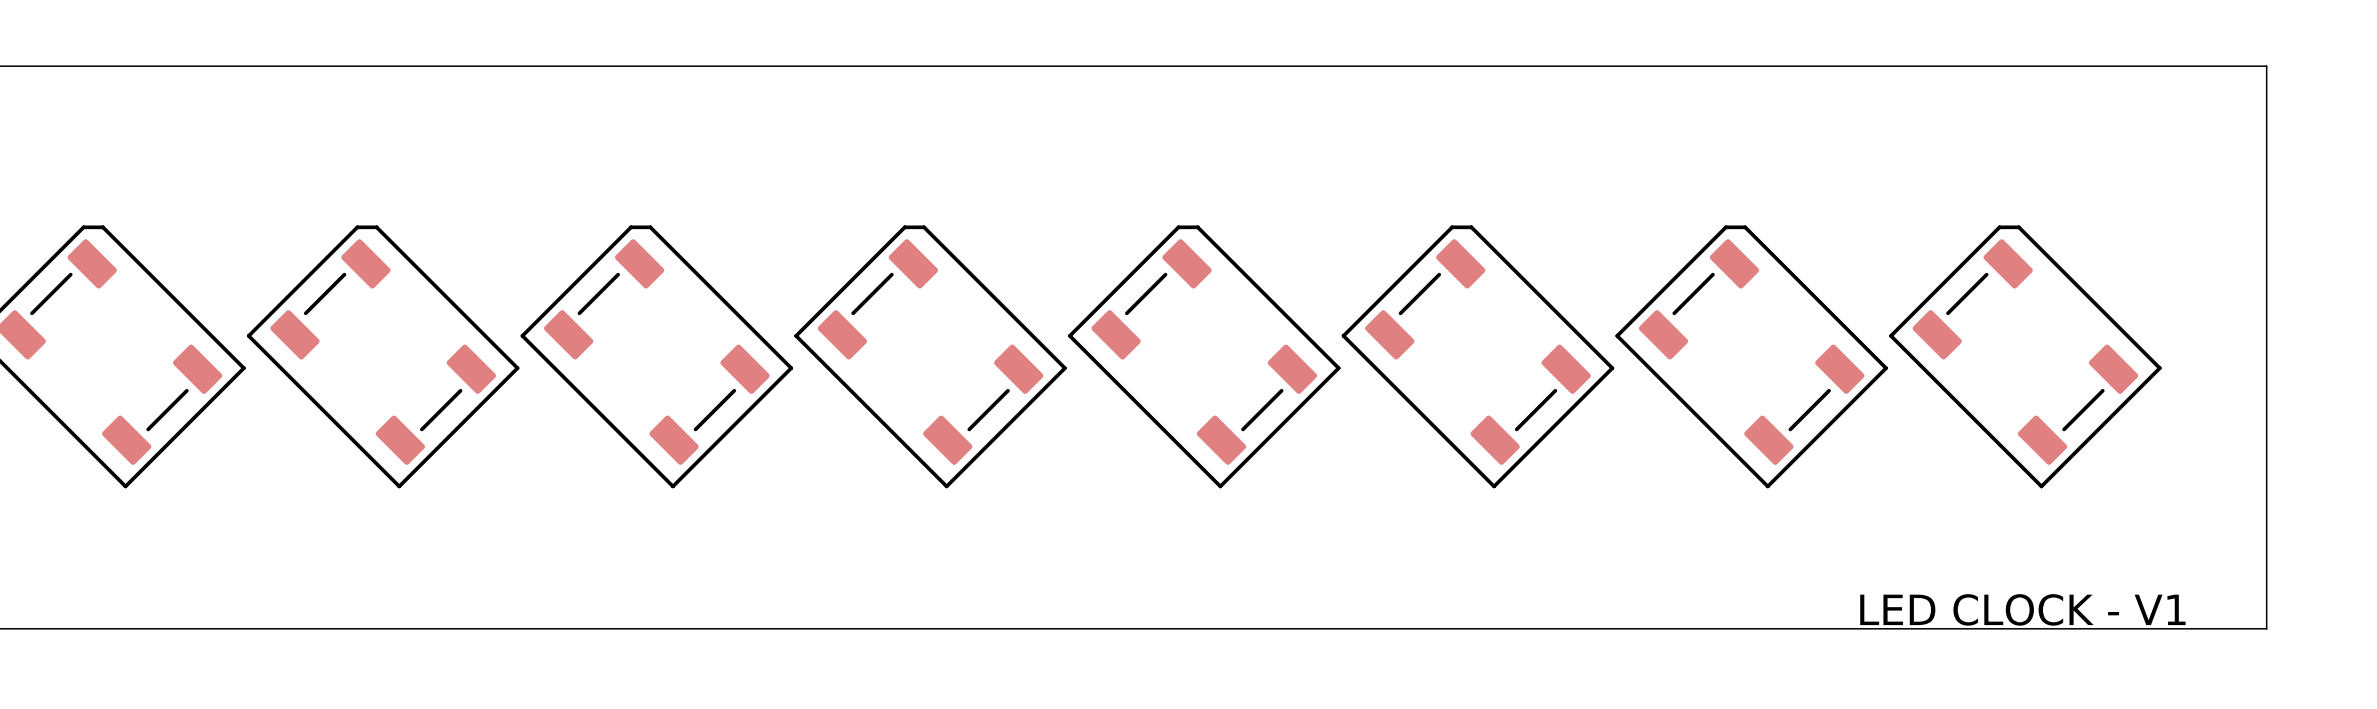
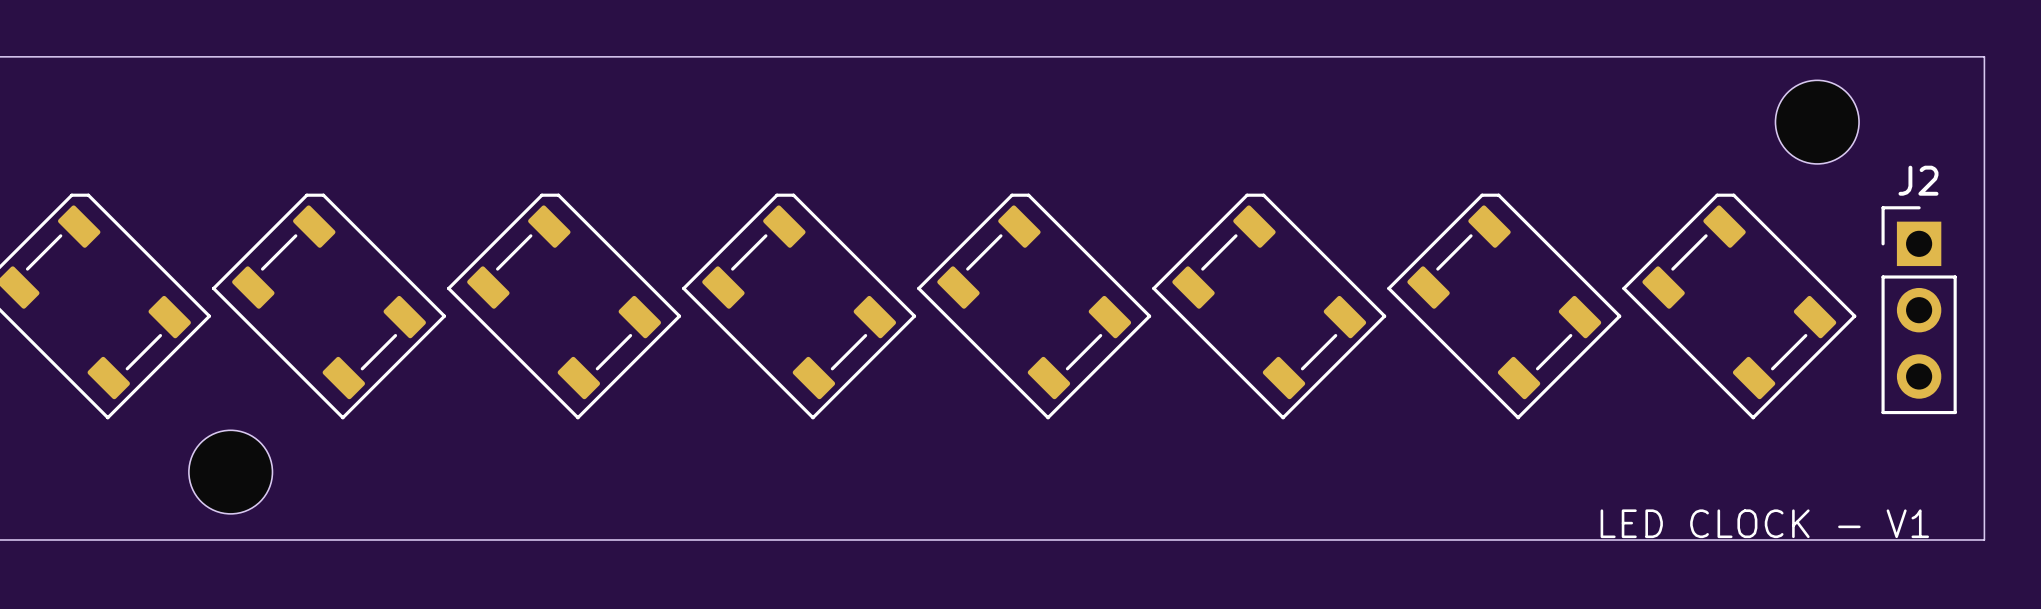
board edge: (2266, 66) (2266, 628) -> (1946, 56) (1984, 56) (1984, 540) (1946, 540)
part: none -> (1817, 122)
J2: none -> (1919, 310)
part: none -> (230, 472)

